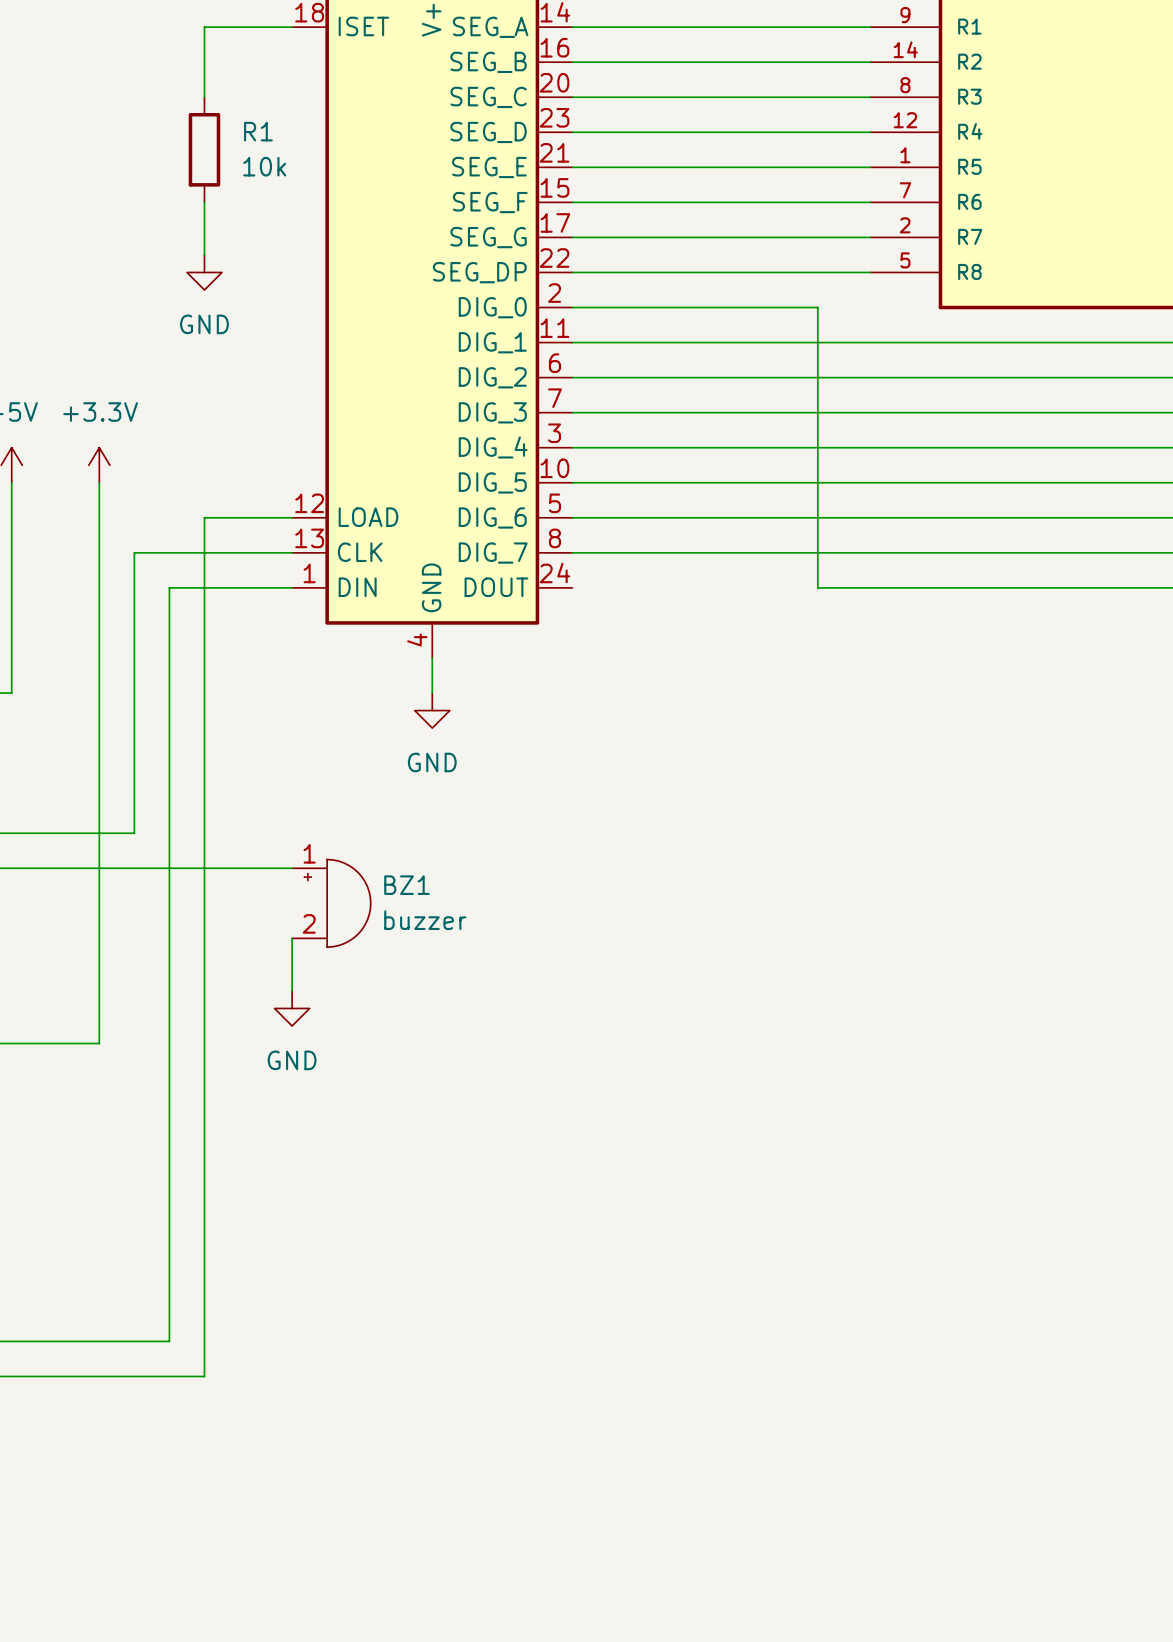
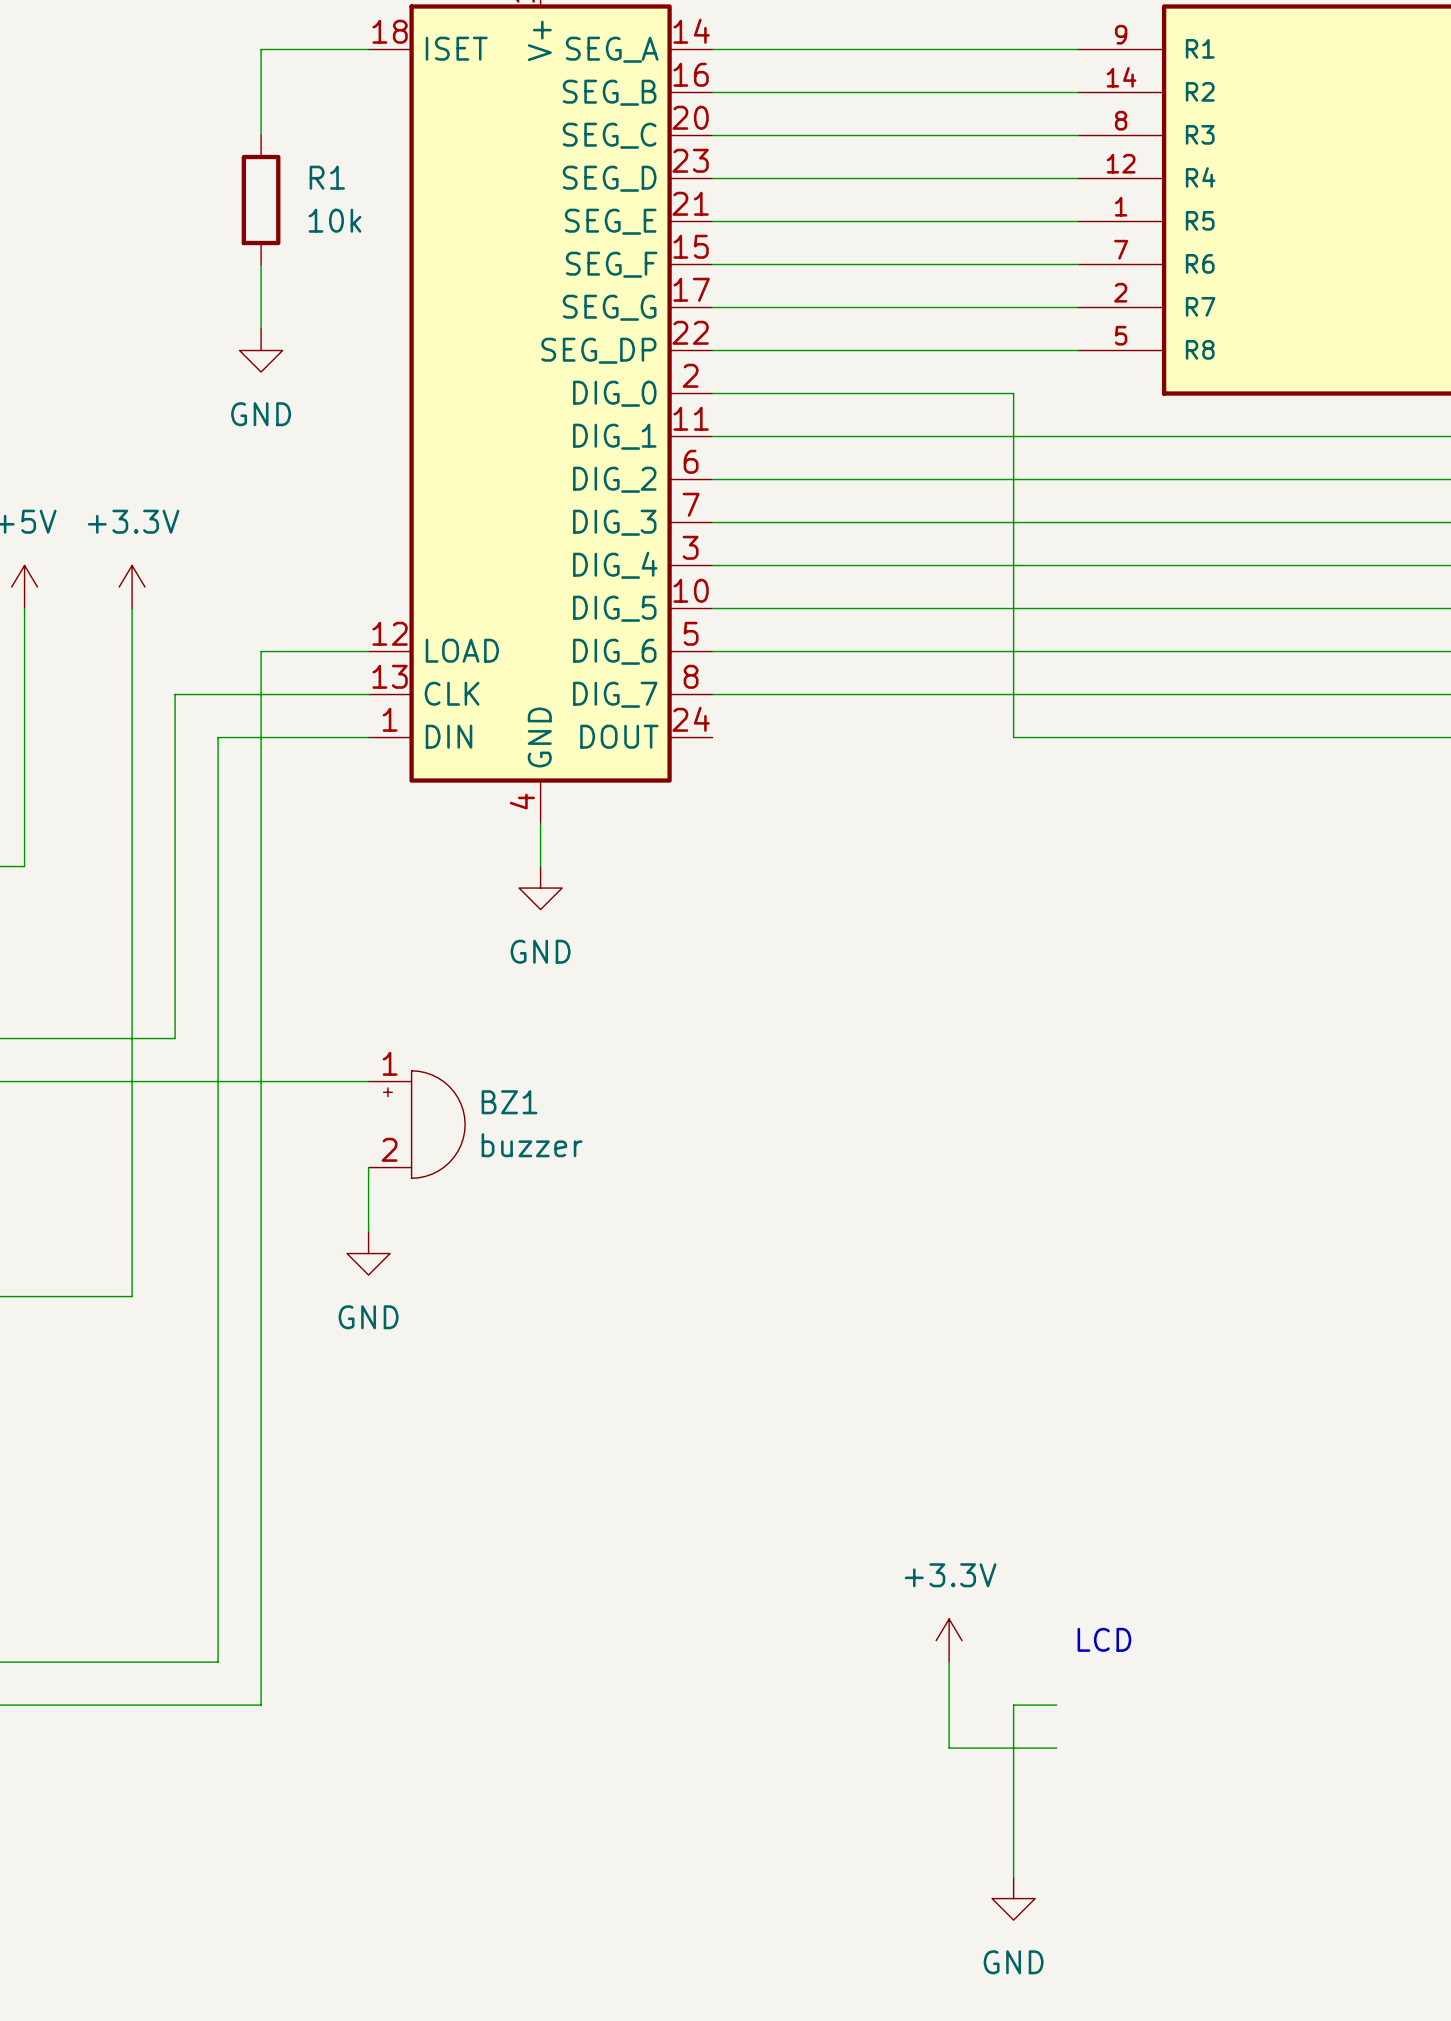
power symbol: none -> +3.3V (949, 1640)
text: none -> LCD (1104, 1639)
wire: none -> (949, 1662) (949, 1748) (1056, 1748)
wire: none -> (1056, 1705) (1013, 1705) (1013, 1877)
power symbol: none -> GND (1013, 1898)

